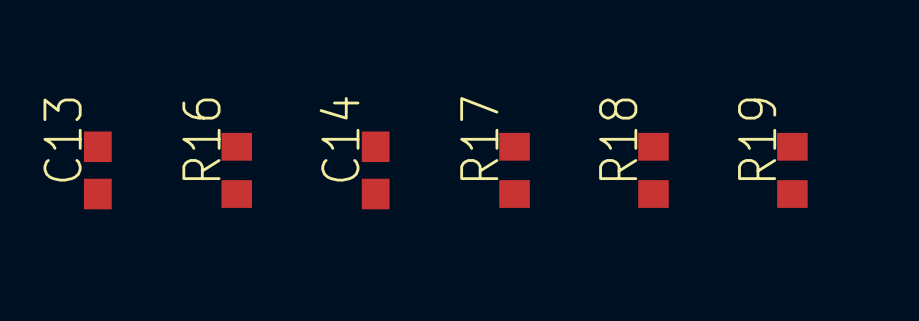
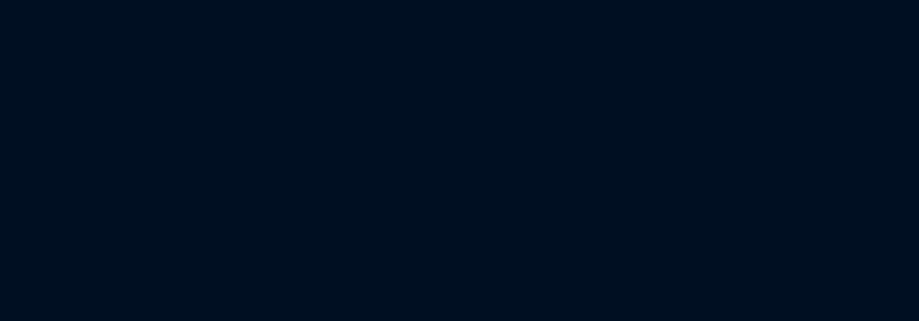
C13: (97, 170) -> none
R16: (236, 170) -> none
C14: (375, 170) -> none
R17: (514, 170) -> none
R18: (653, 170) -> none
R19: (792, 170) -> none

